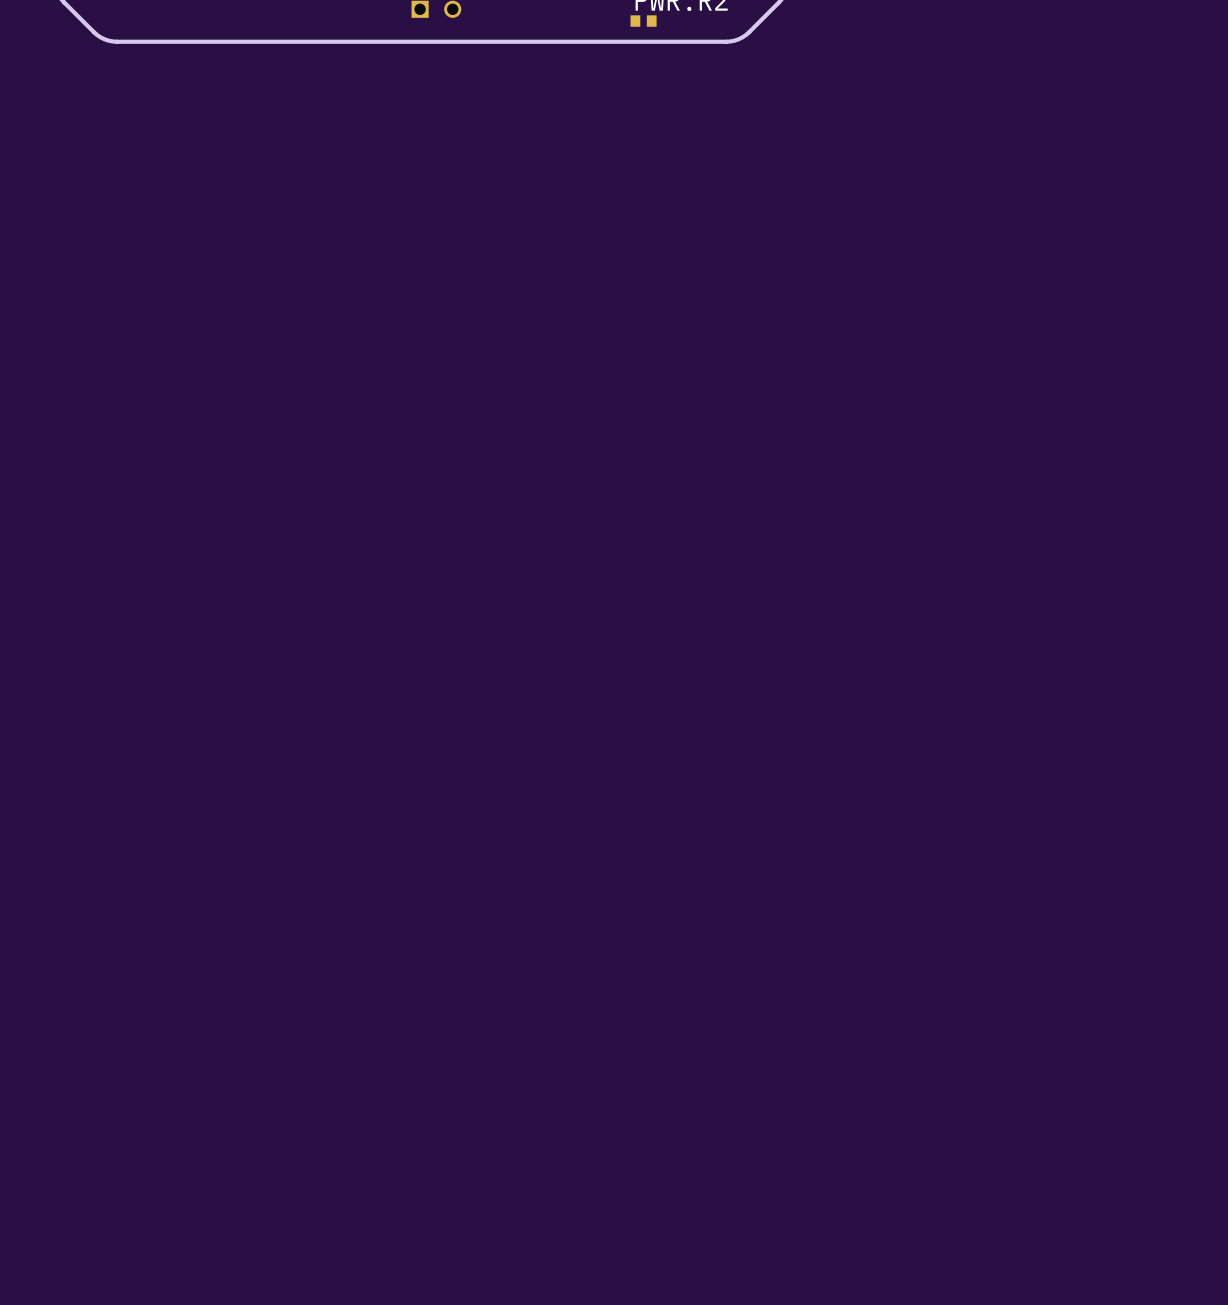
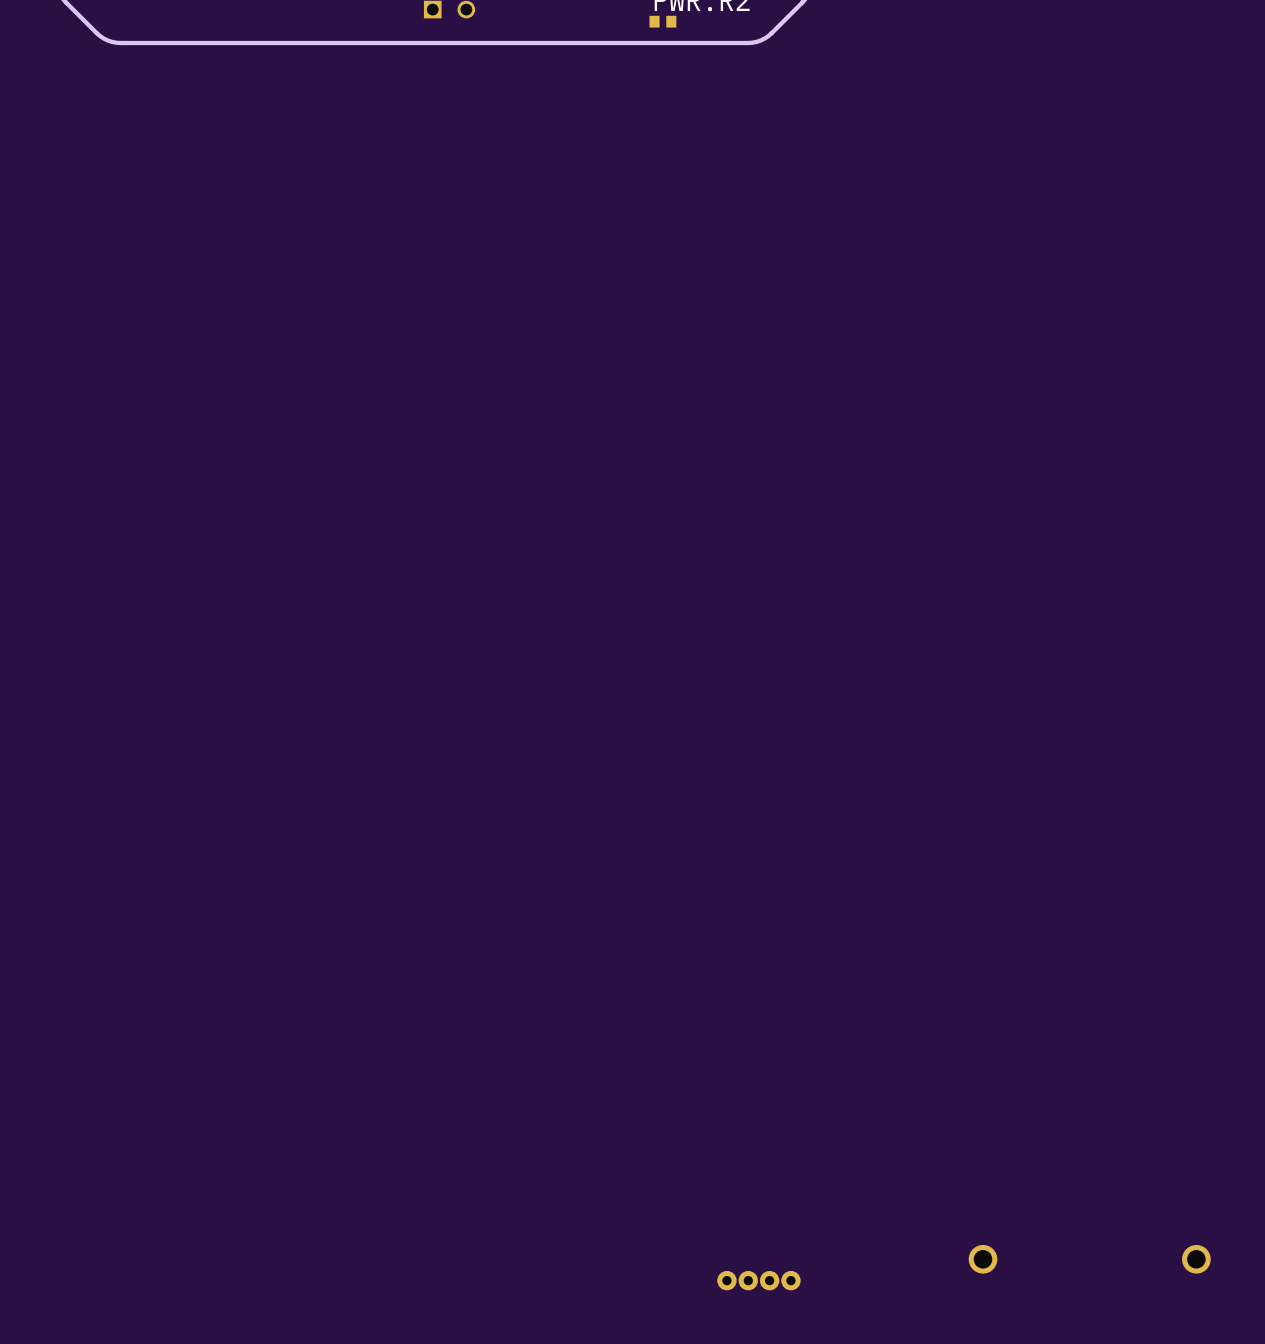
part: none -> (983, 1259)
part: none -> (1196, 1259)
part: none -> (758, 1280)

